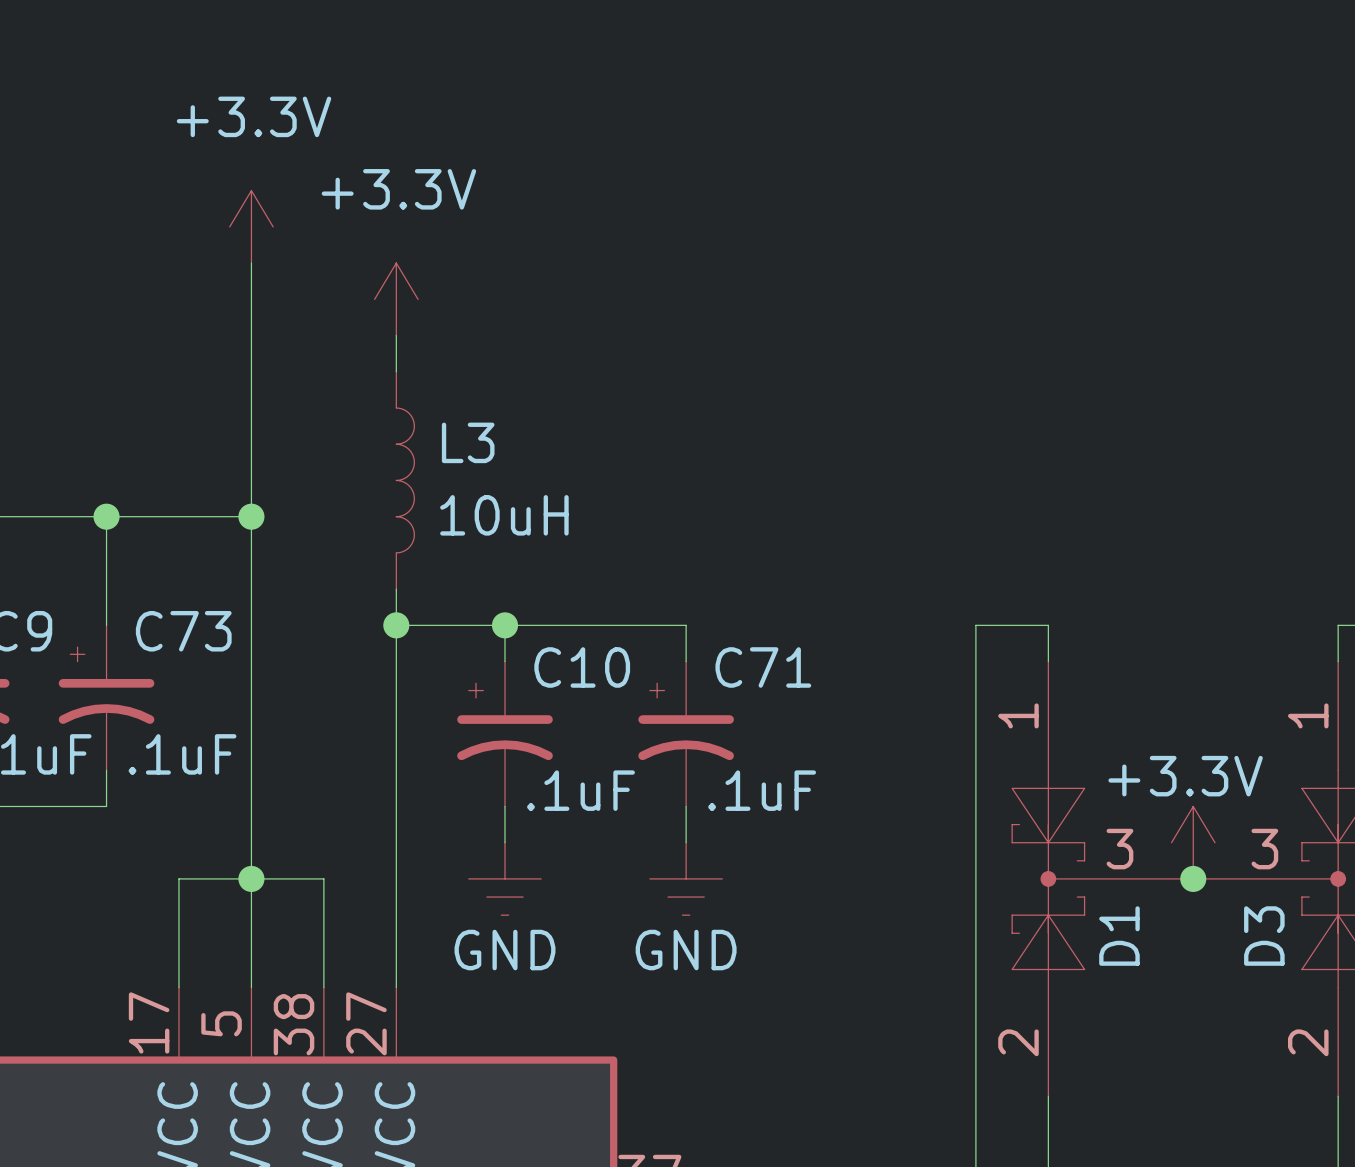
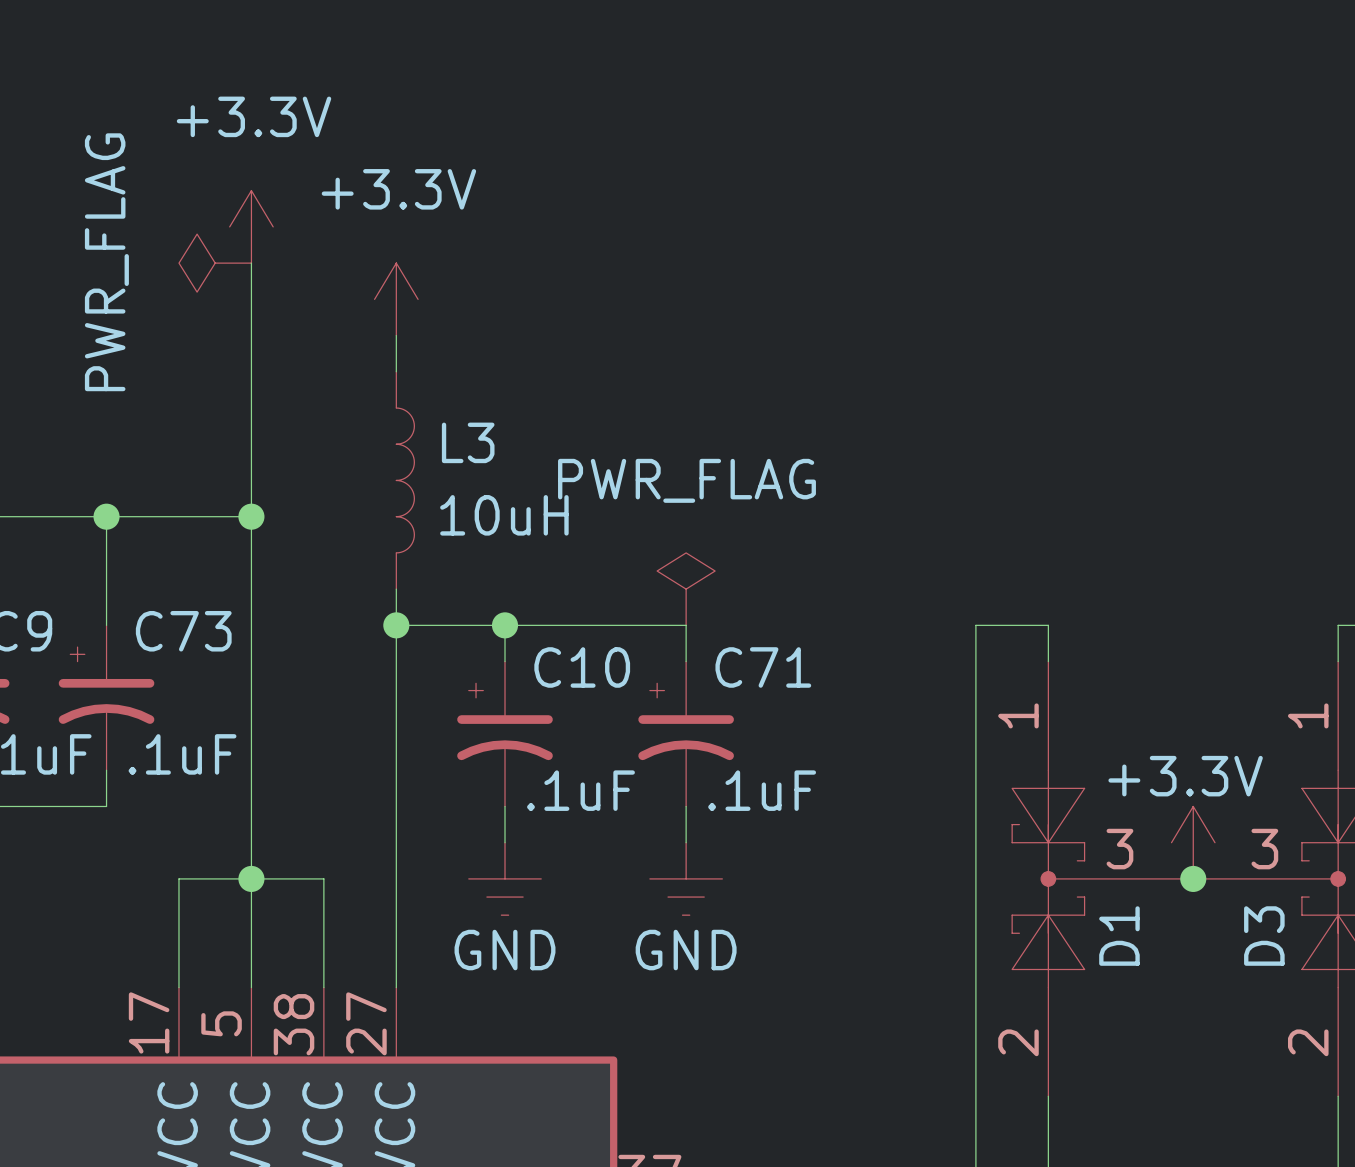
power symbol: none -> PWR_FLAG (215, 263)
power symbol: none -> PWR_FLAG (686, 589)

